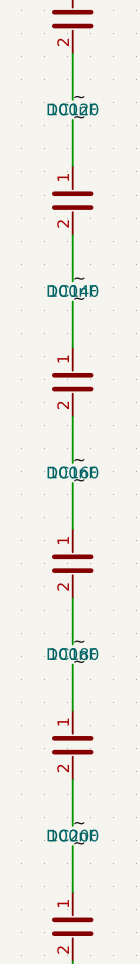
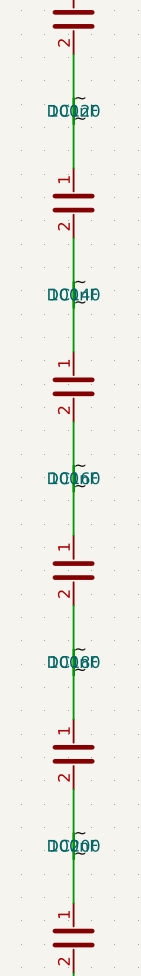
wire: none -> (73, 101) (73, 121)
wire: none -> (73, 284) (73, 305)
wire: none -> (73, 468) (73, 488)
wire: none -> (73, 652) (73, 672)
wire: none -> (73, 835) (73, 856)

